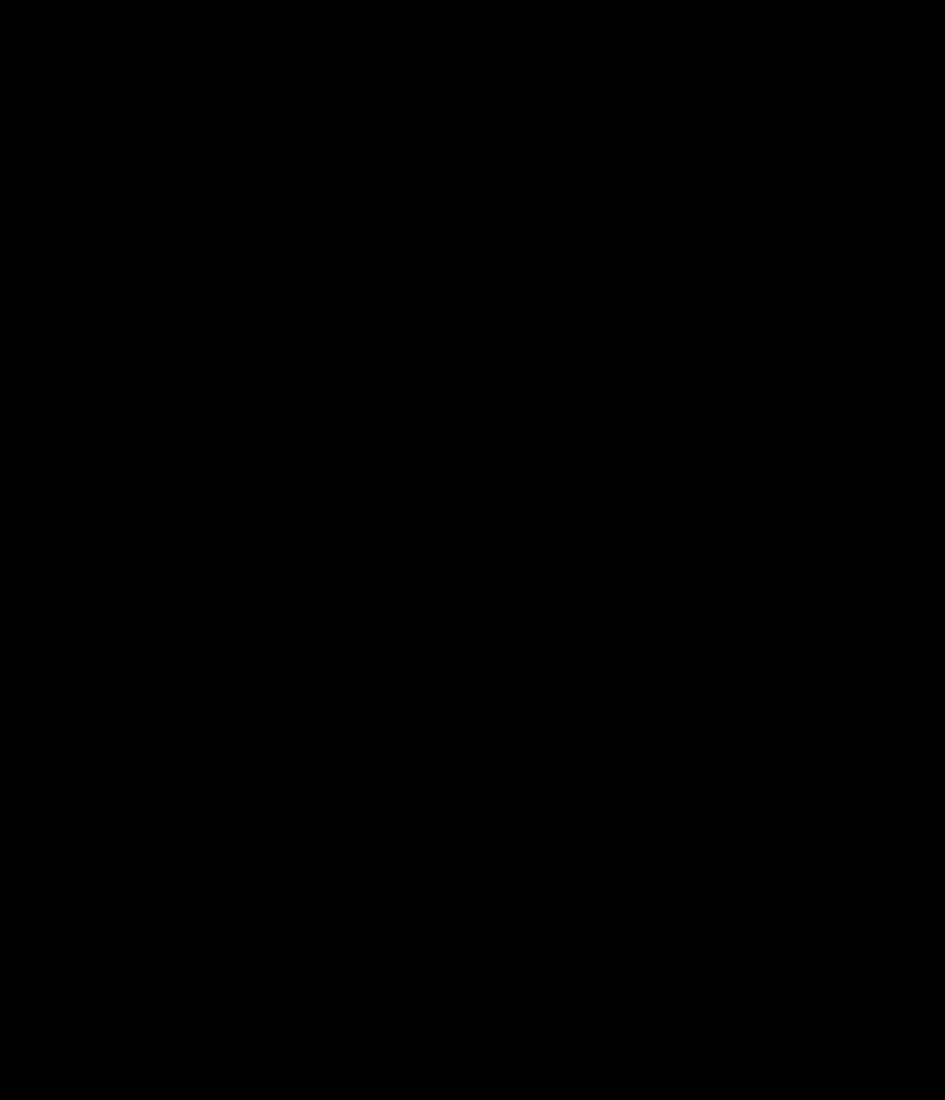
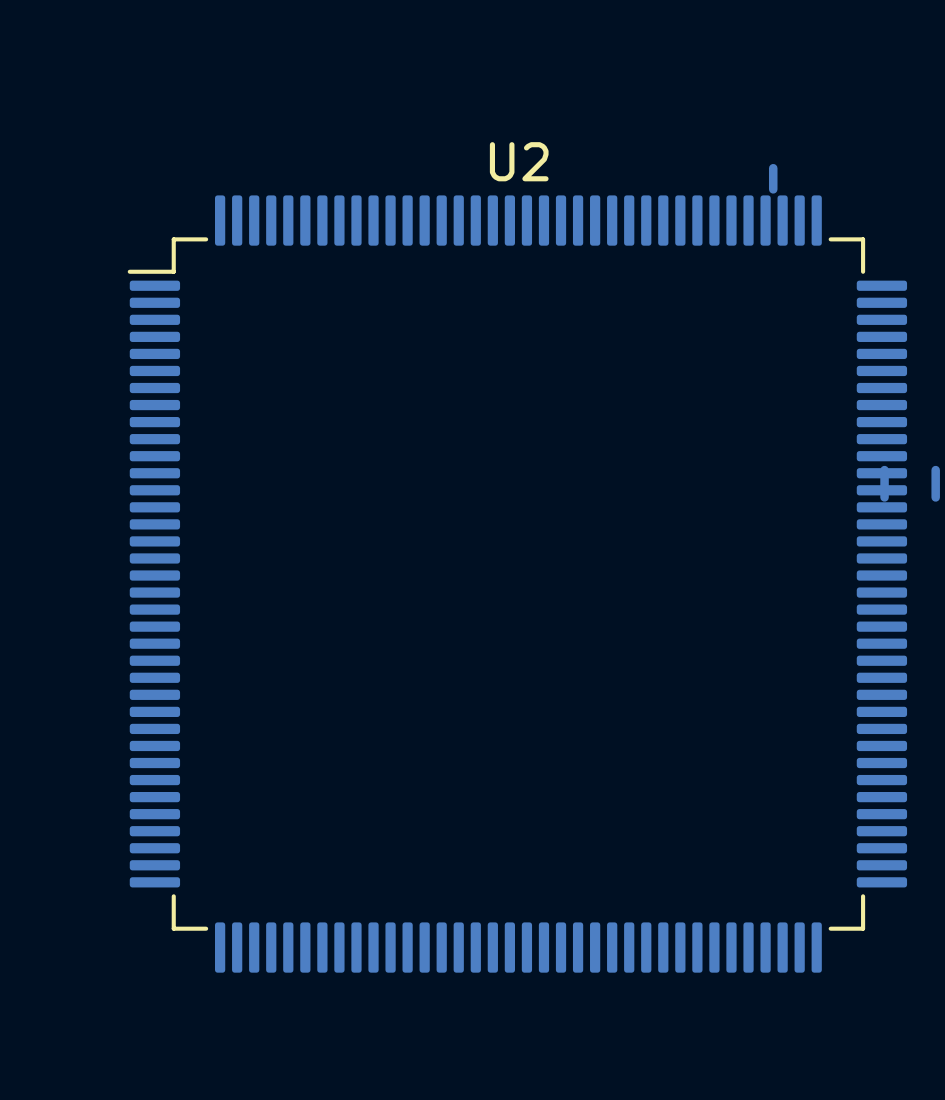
track: none -> (773, 168) (773, 189)
track: none -> (884, 470) (884, 497)
track: none -> (935, 470) (935, 497)
U2: none -> (517, 584)

